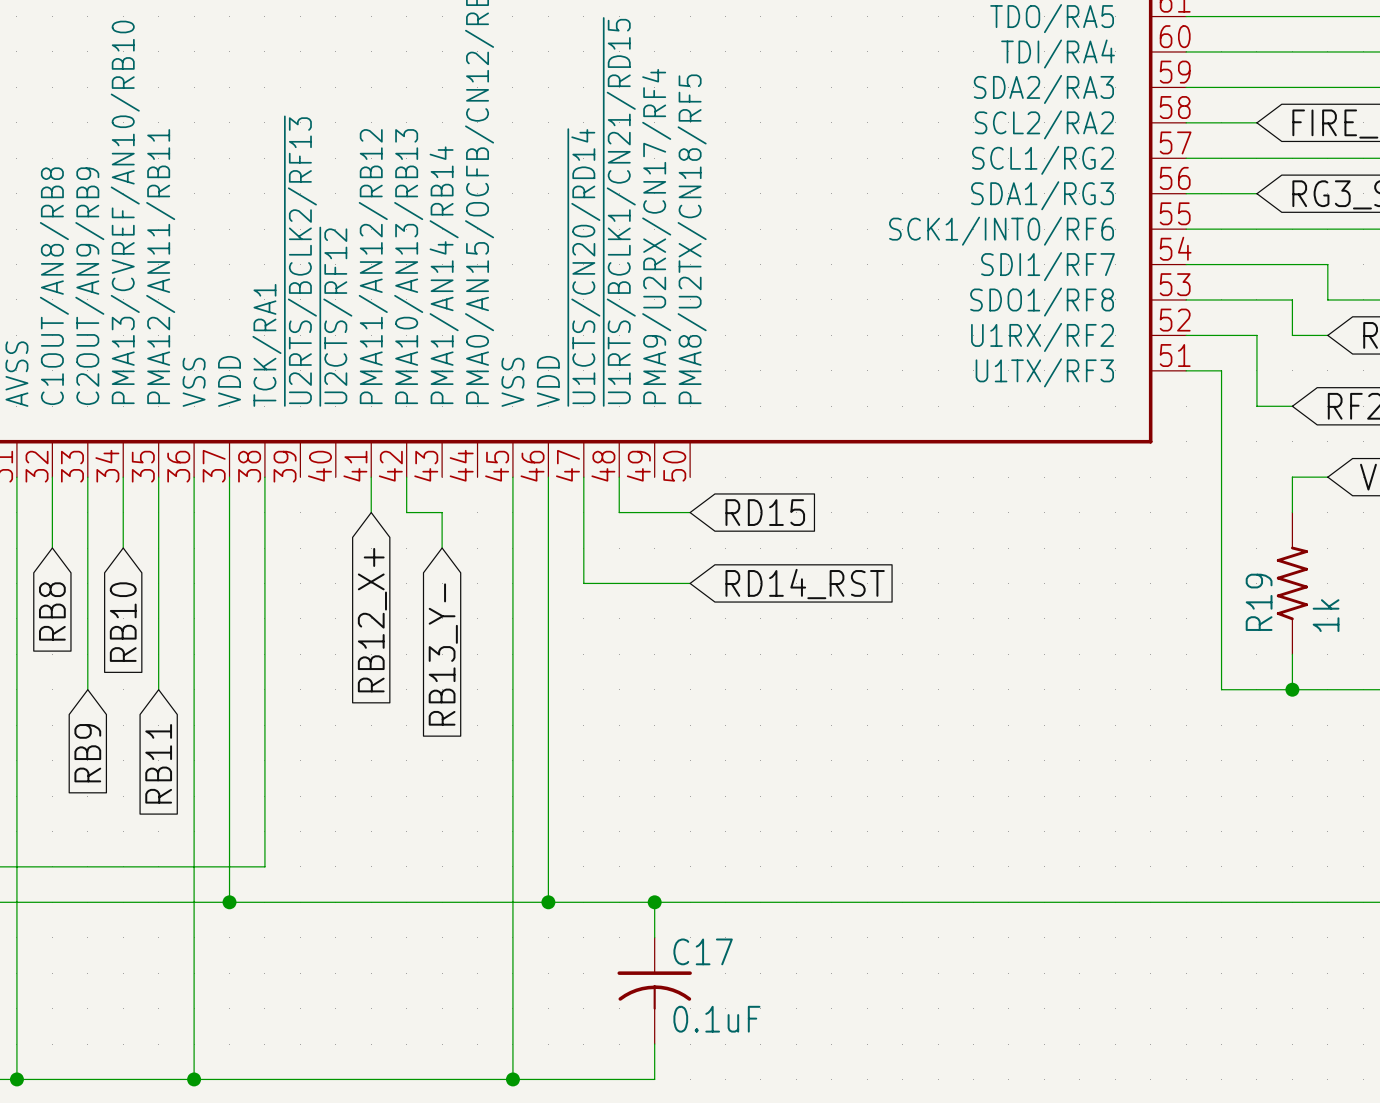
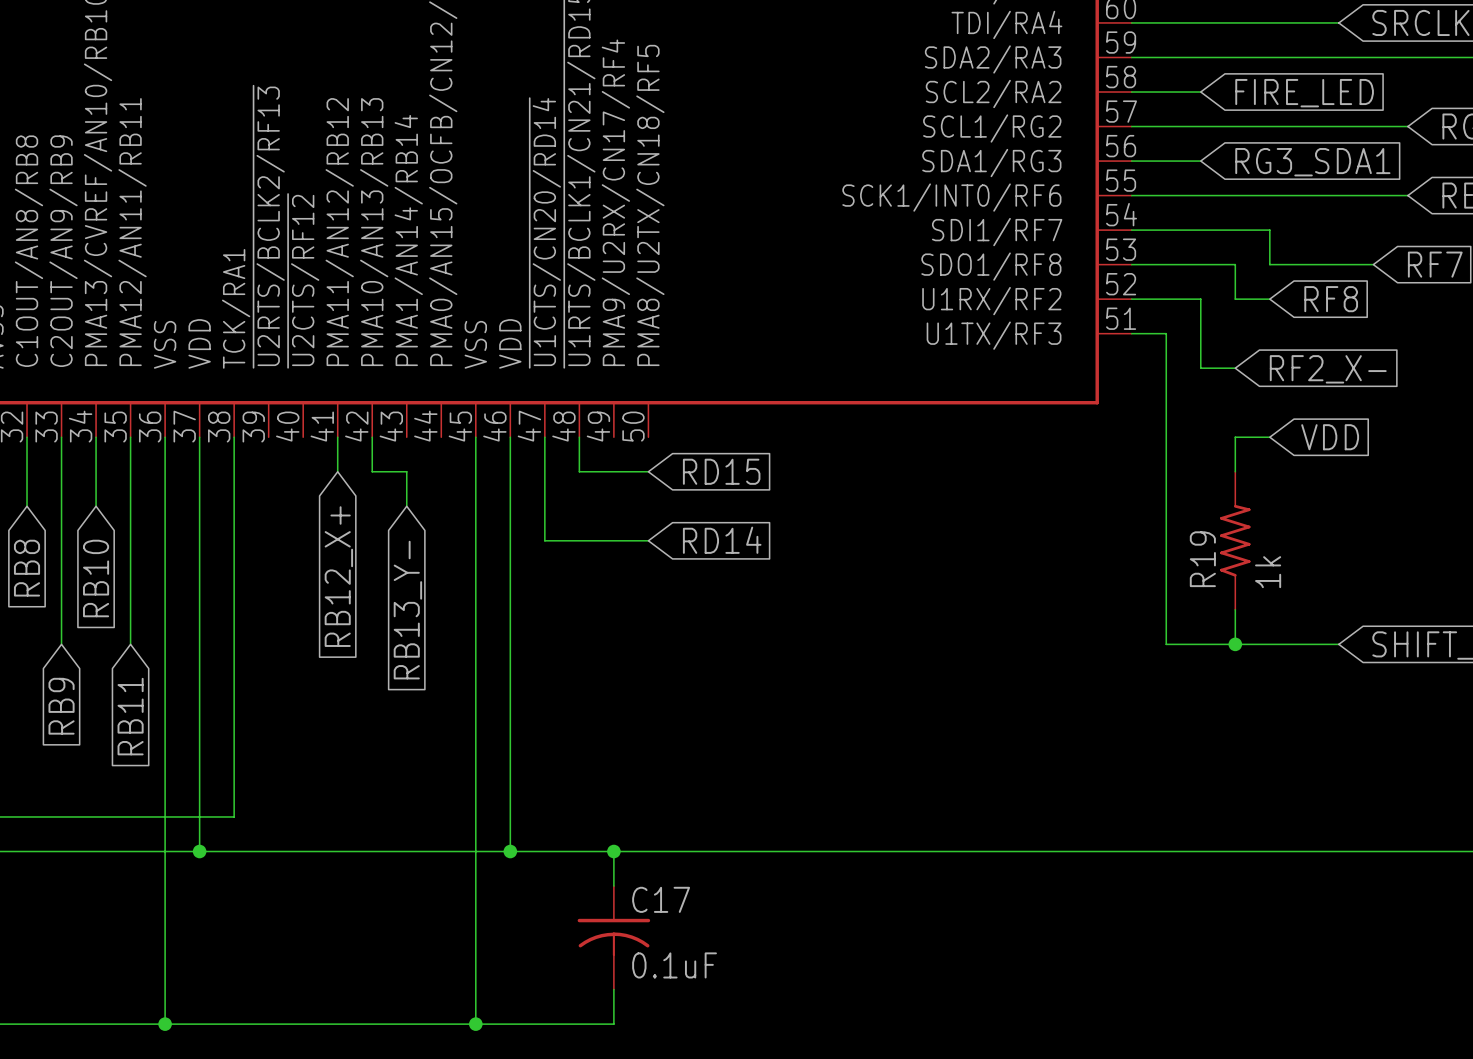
global label: RD14_RST (805, 584) -> RD14 (722, 540)

